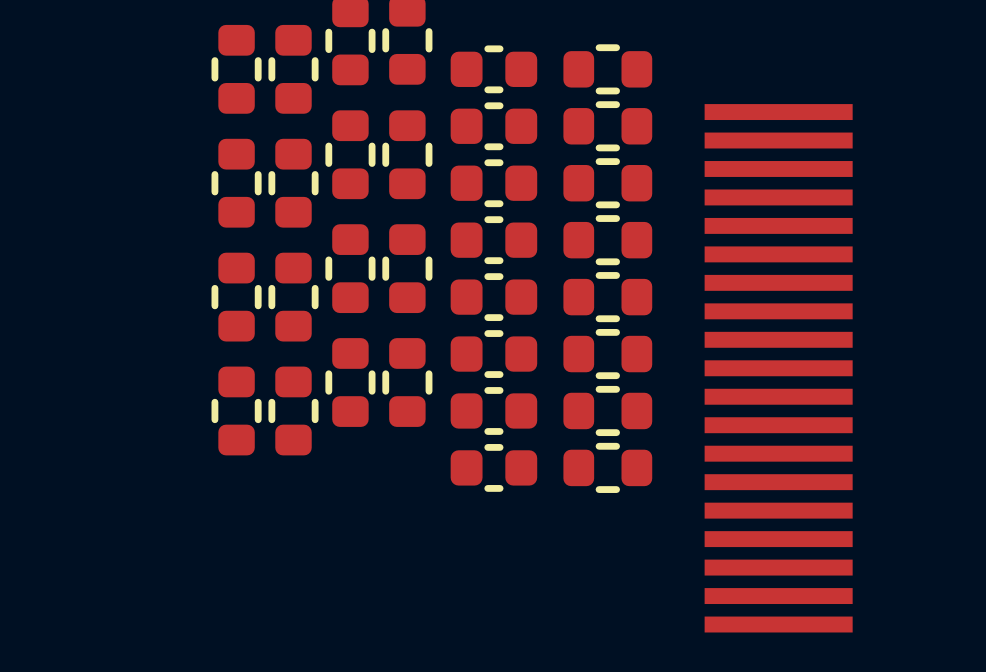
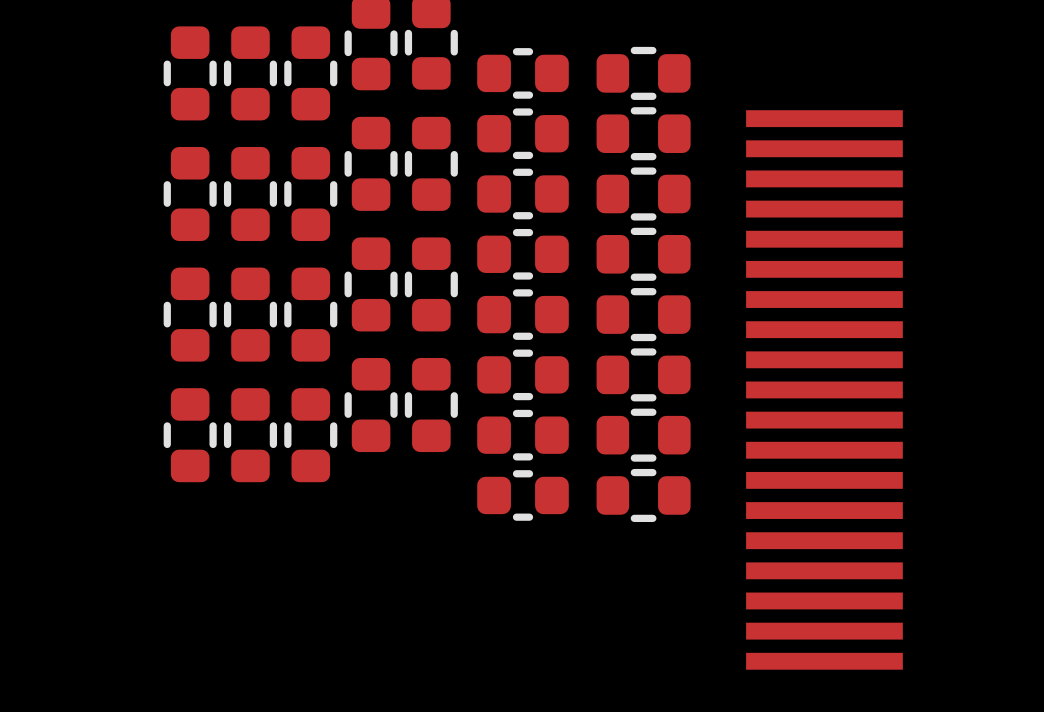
part: none -> (190, 73)
part: none -> (190, 194)
part: none -> (190, 314)
part: none -> (190, 435)

